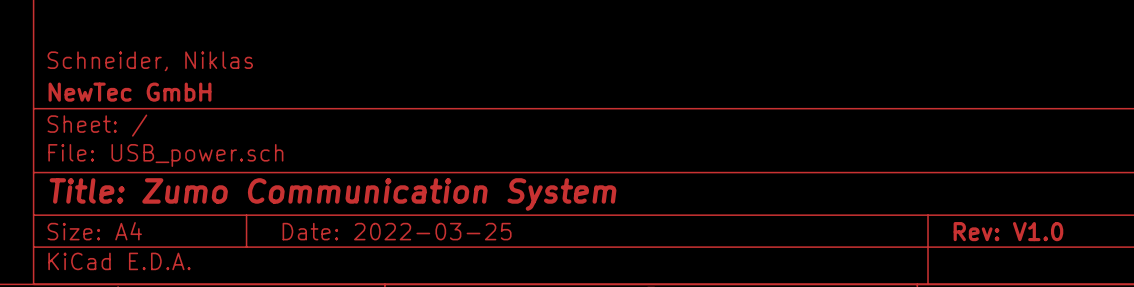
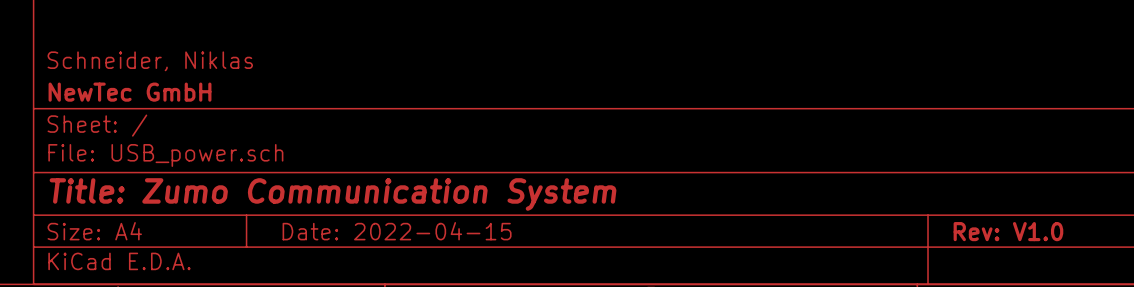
title block: Date: 2022-03-25 (397, 231) -> Date: 2022-04-15 (397, 231)

